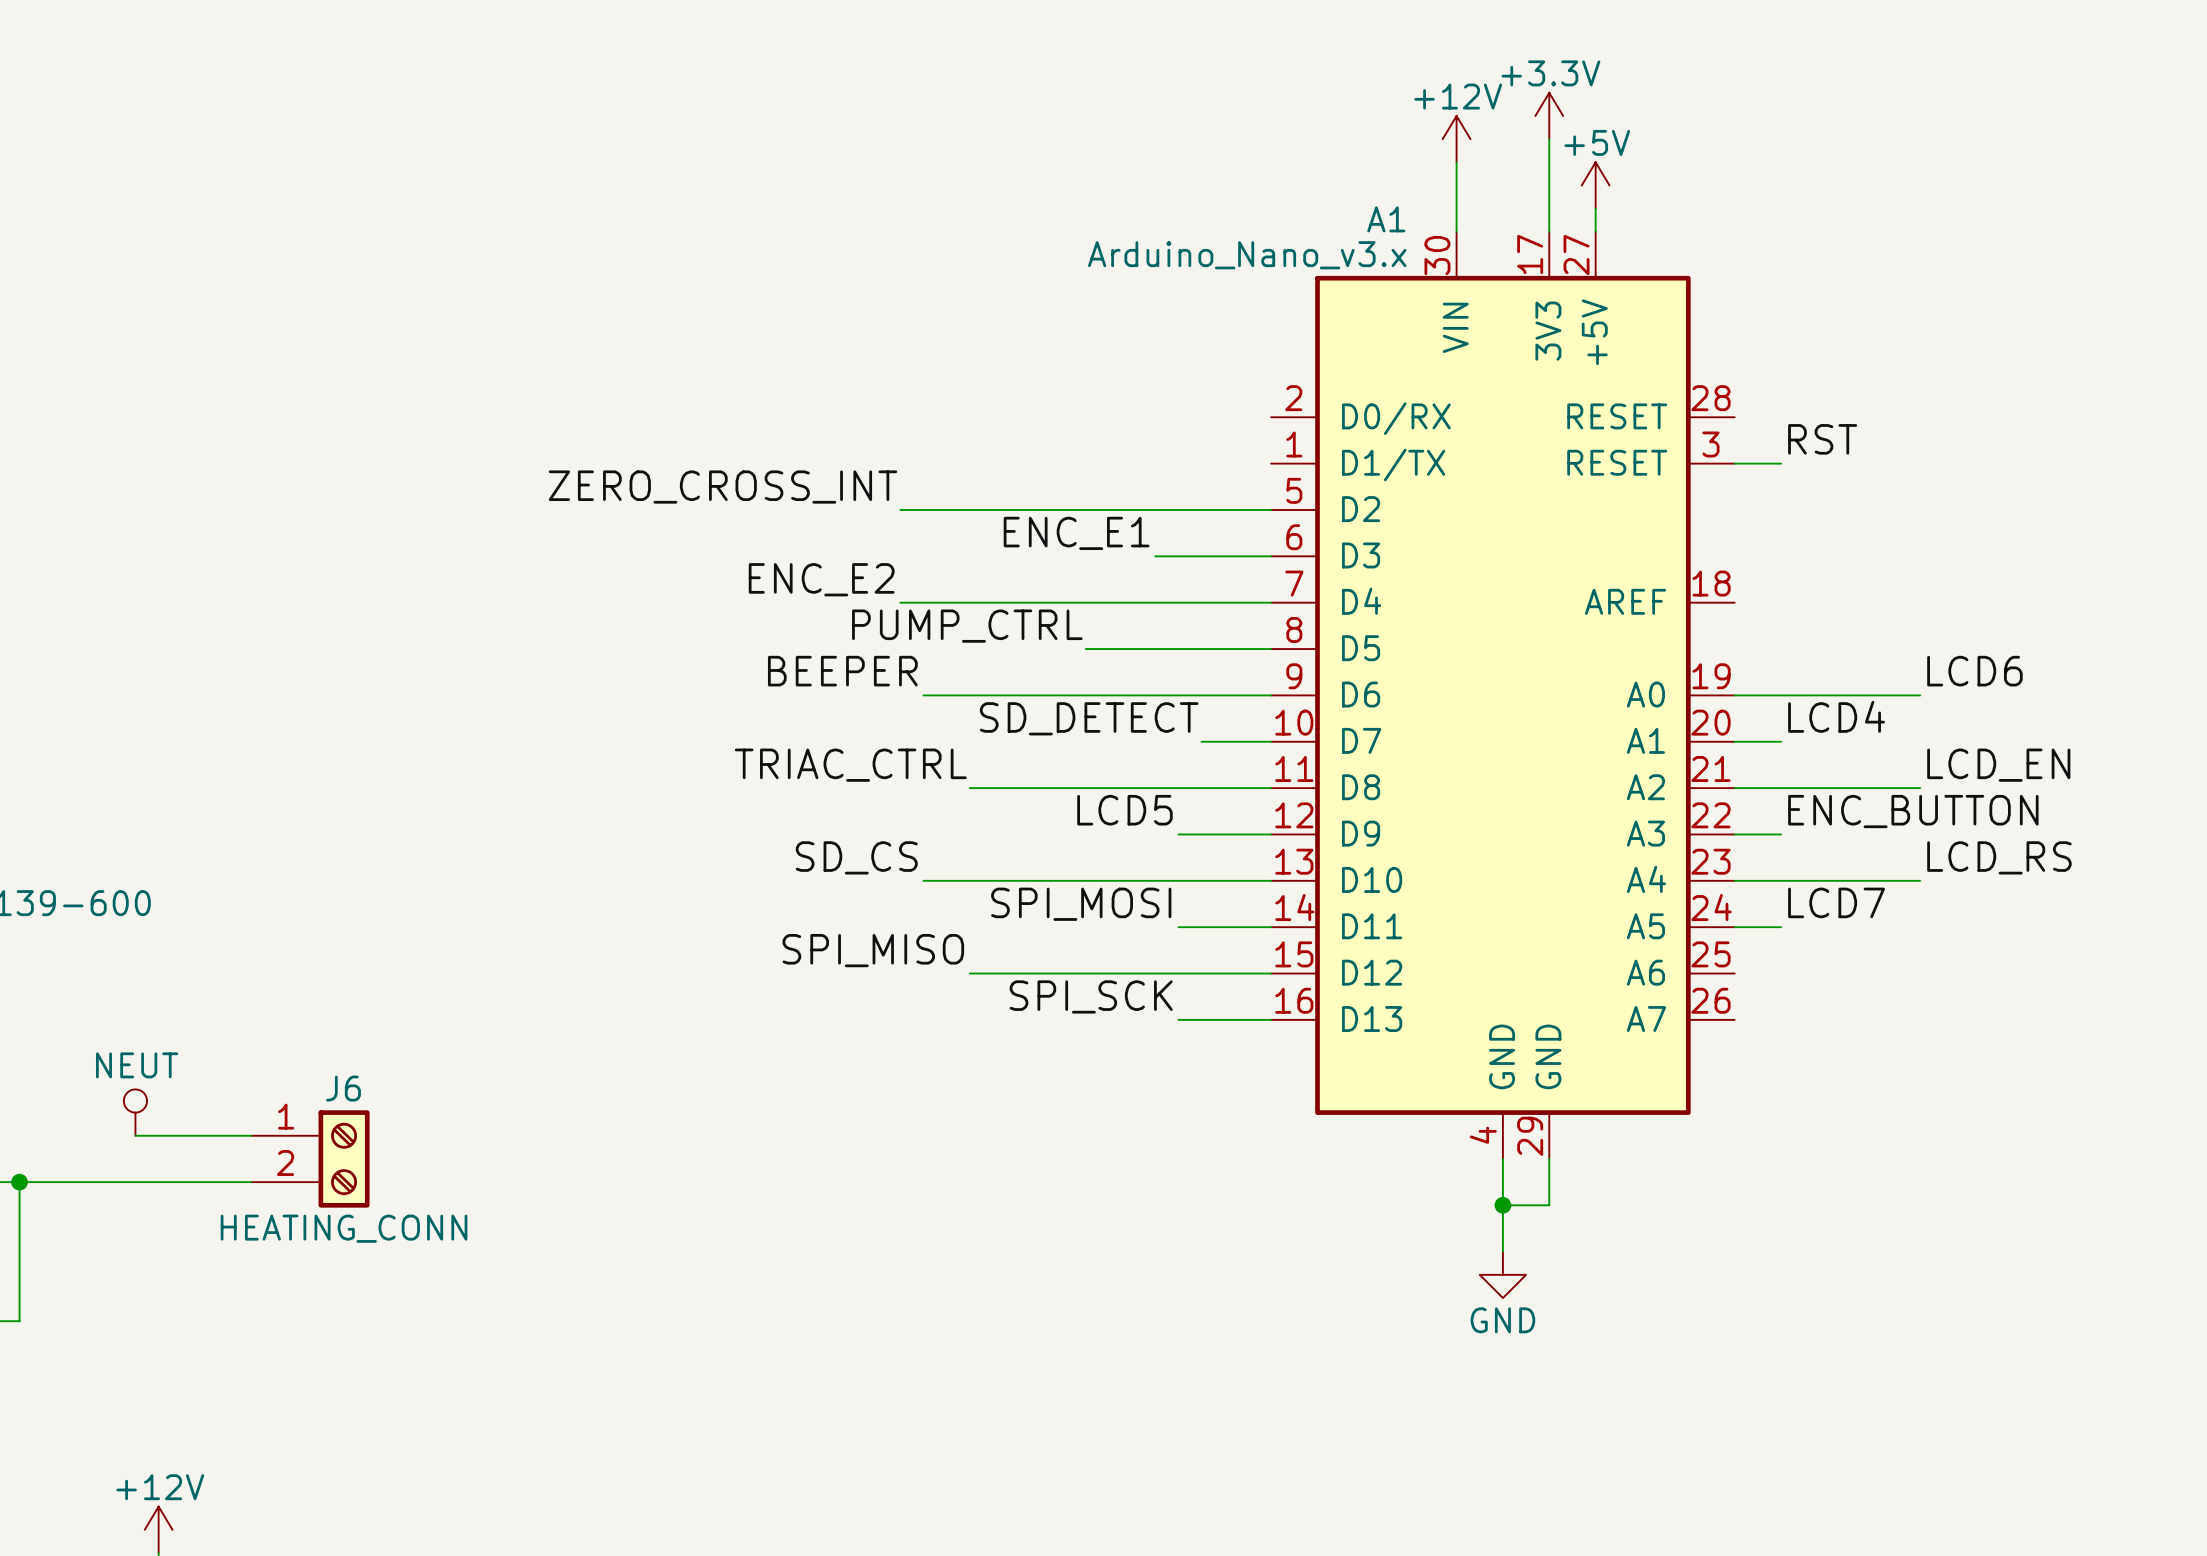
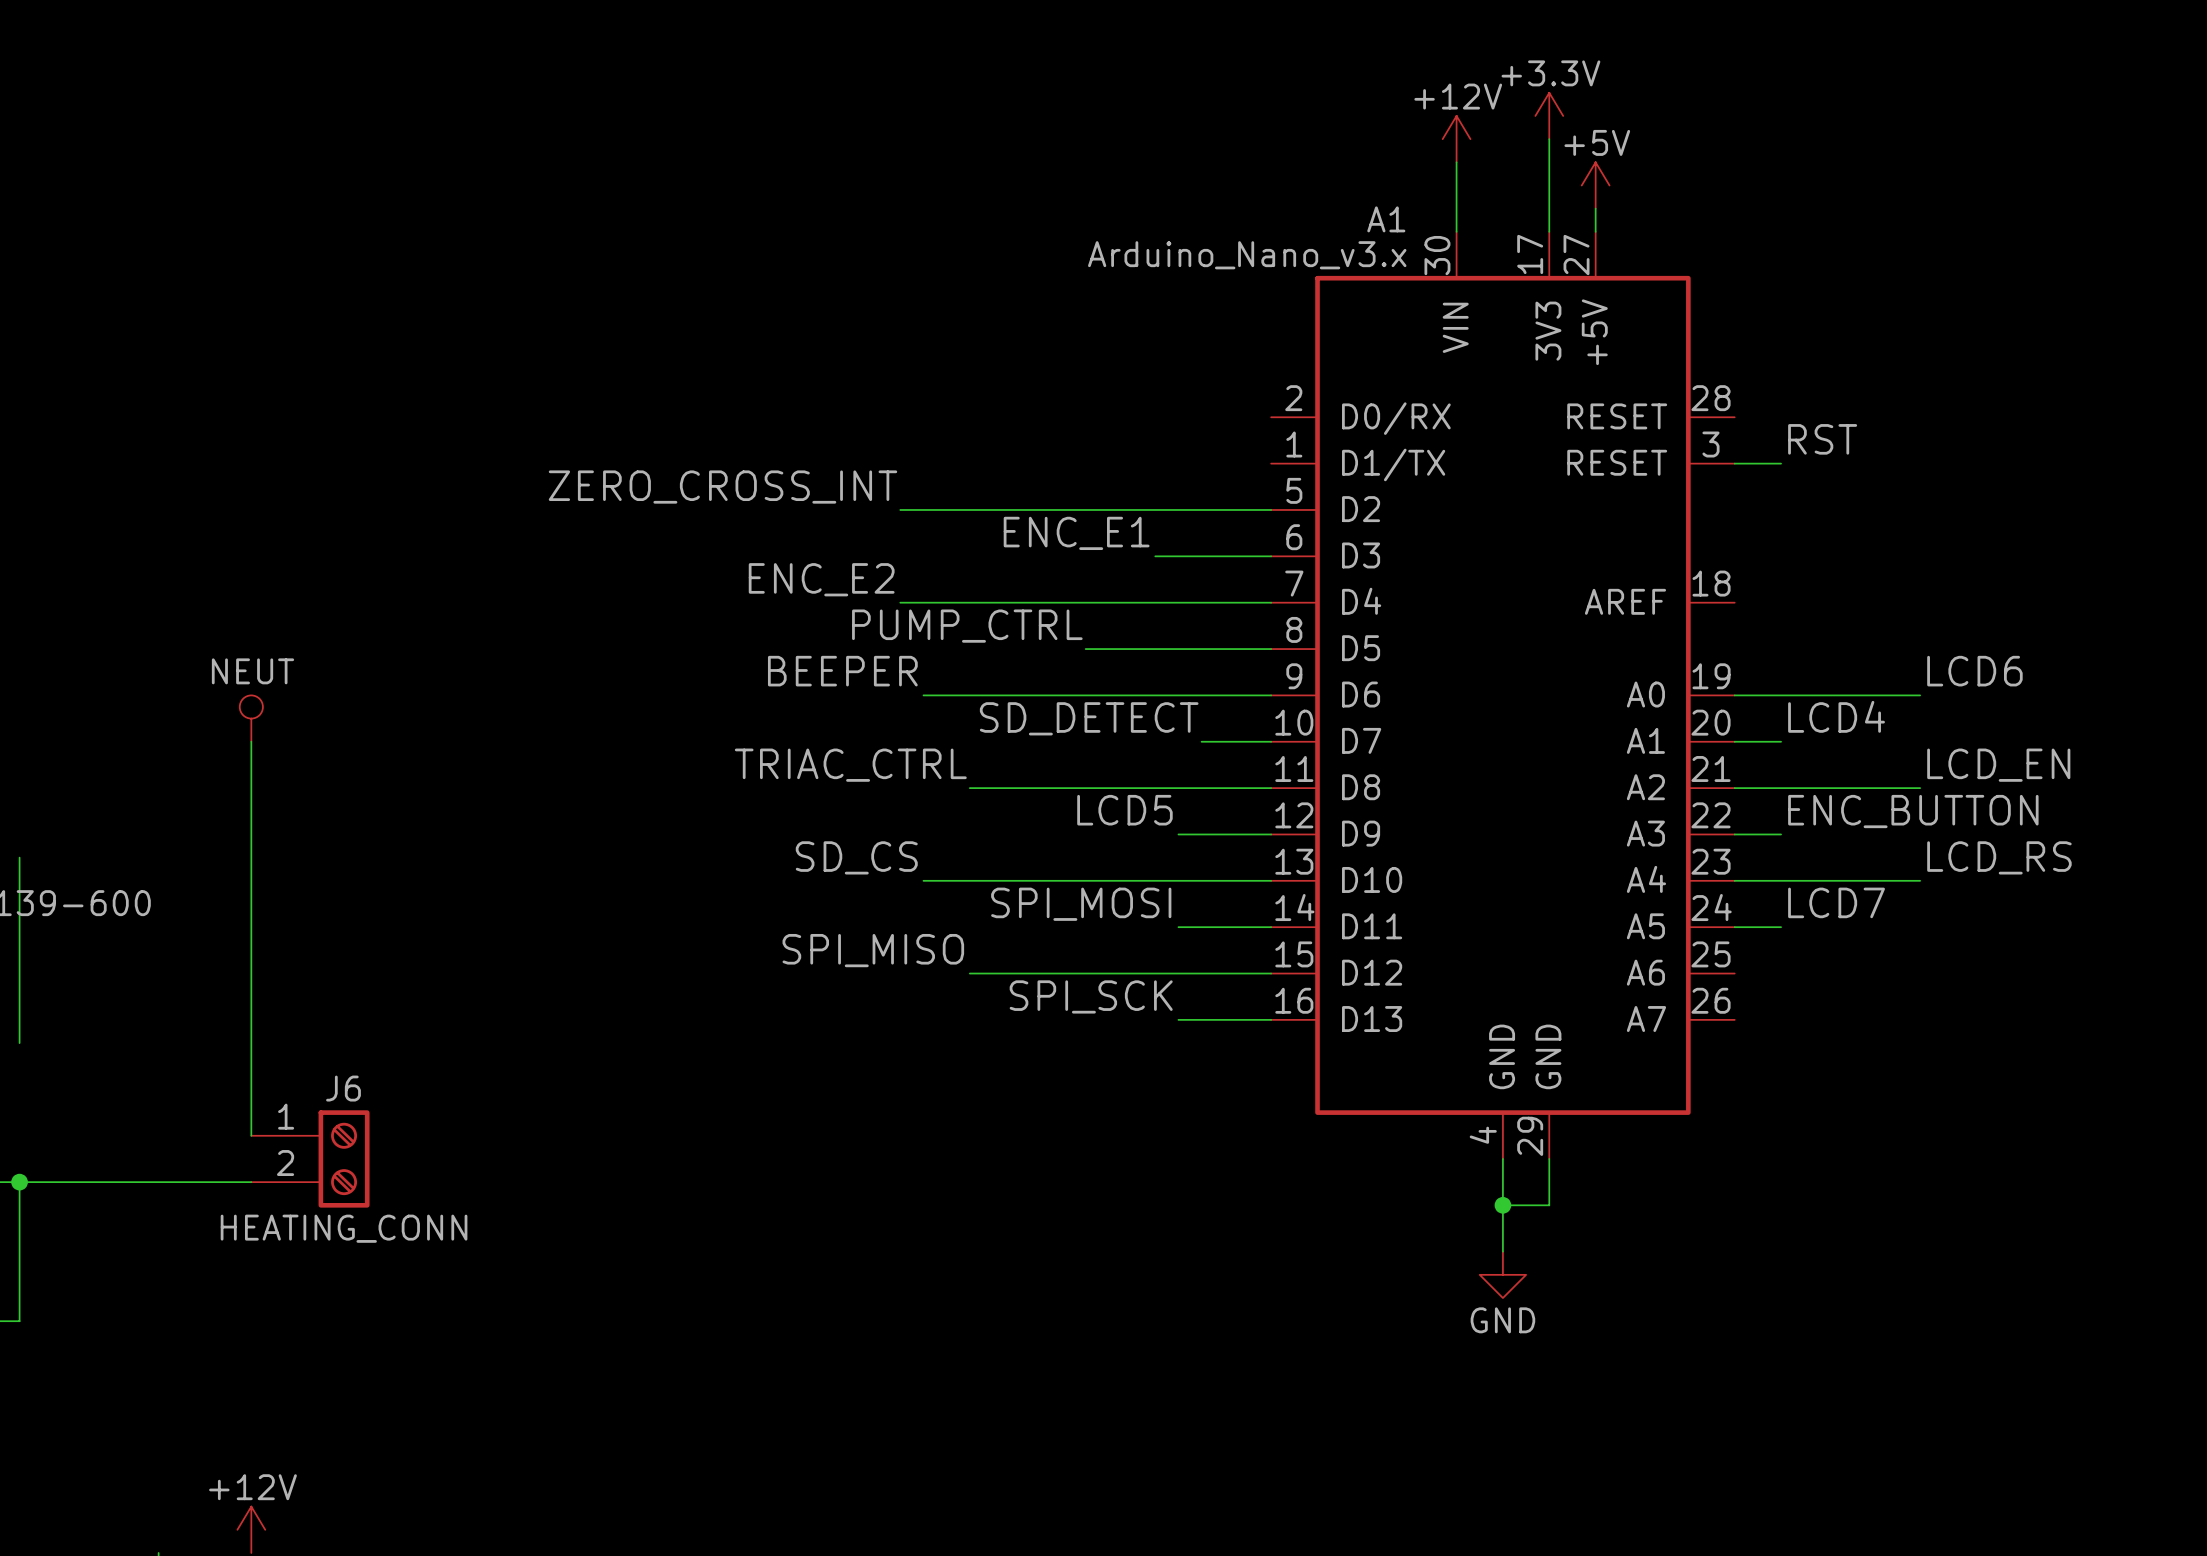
wire: none -> (19, 857) (19, 1043)
power symbol position: NEUT (135, 1112) -> NEUT (251, 718)
wire: (135, 1135) (251, 1135) -> (251, 741) (251, 1135)
power symbol position: +12V (158, 1529) -> +12V (251, 1529)

